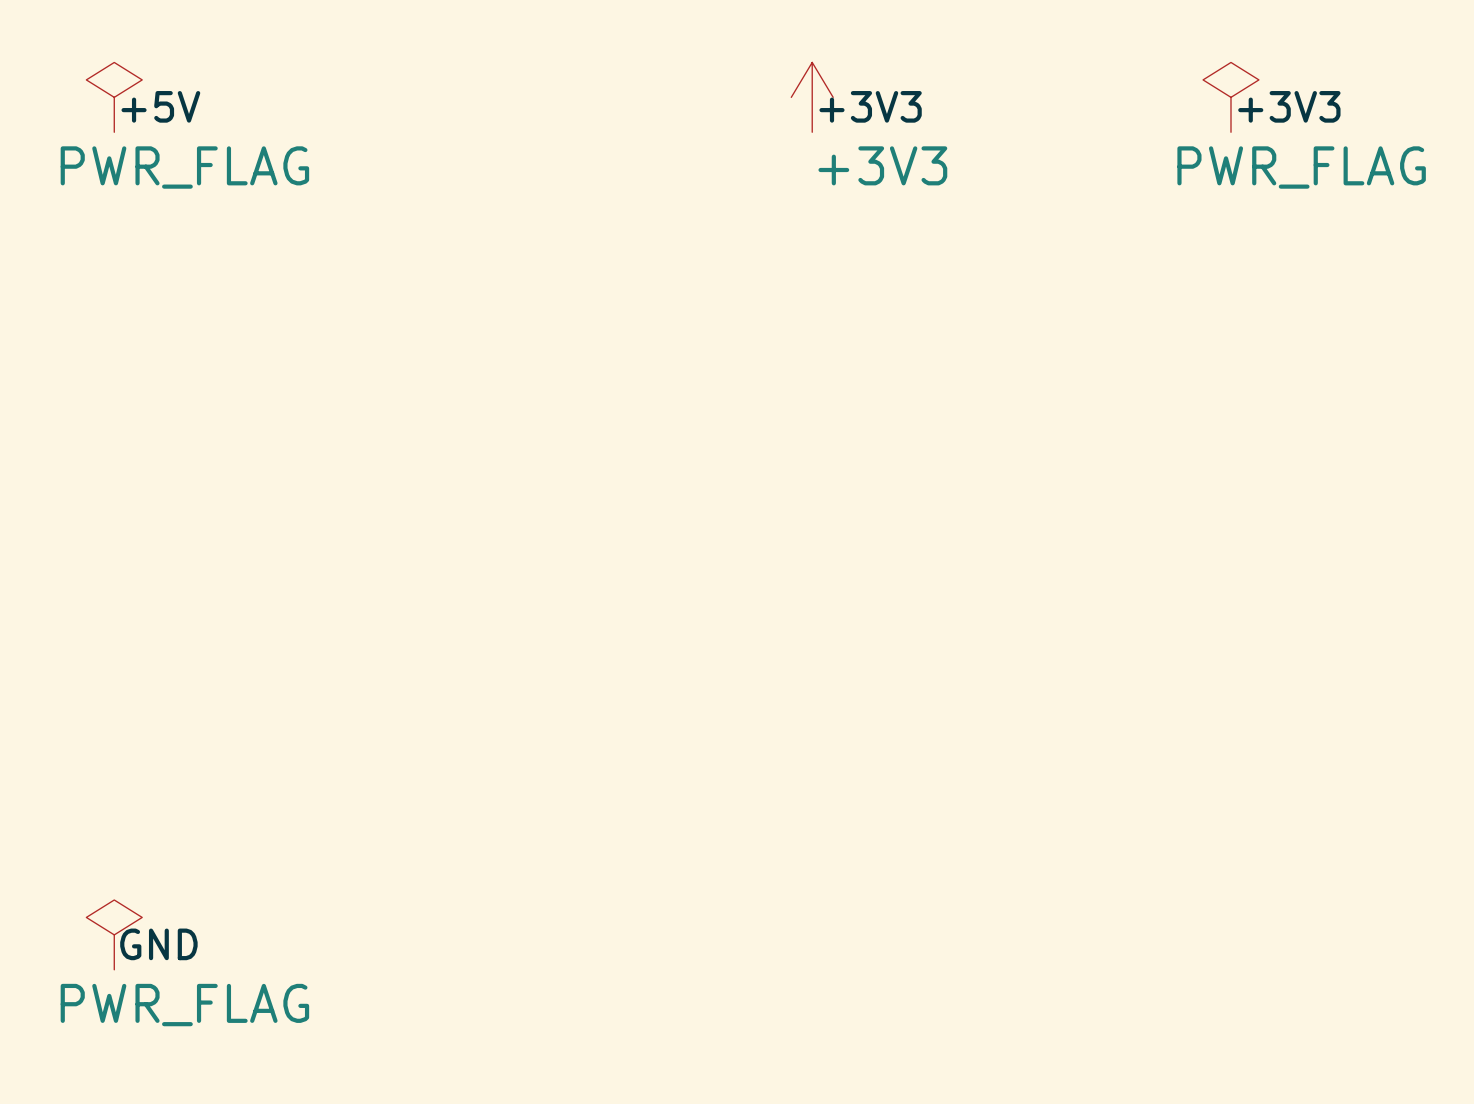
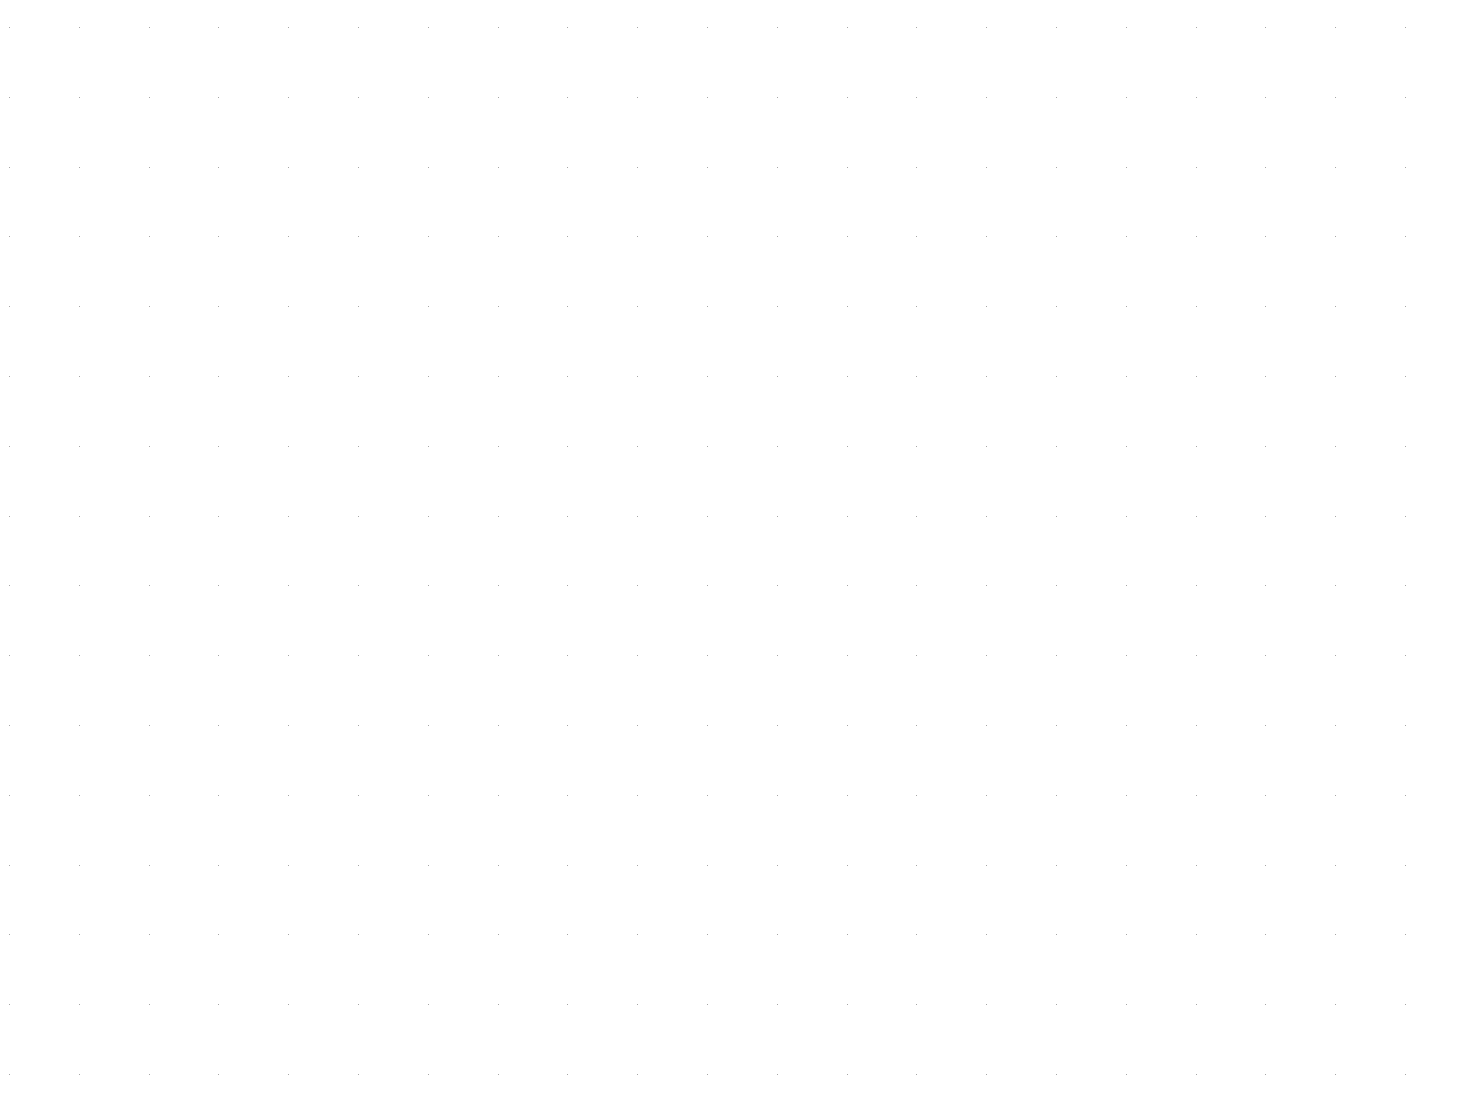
power symbol: PWR_FLAG (114, 97) -> none
power symbol: +3V3 (812, 97) -> none
power symbol: PWR_FLAG (1230, 97) -> none
label: +5V (160, 106) -> none
label: +3V3 (870, 106) -> none
label: +3V3 (1289, 106) -> none
power symbol: PWR_FLAG (114, 934) -> none
label: GND (158, 944) -> none

